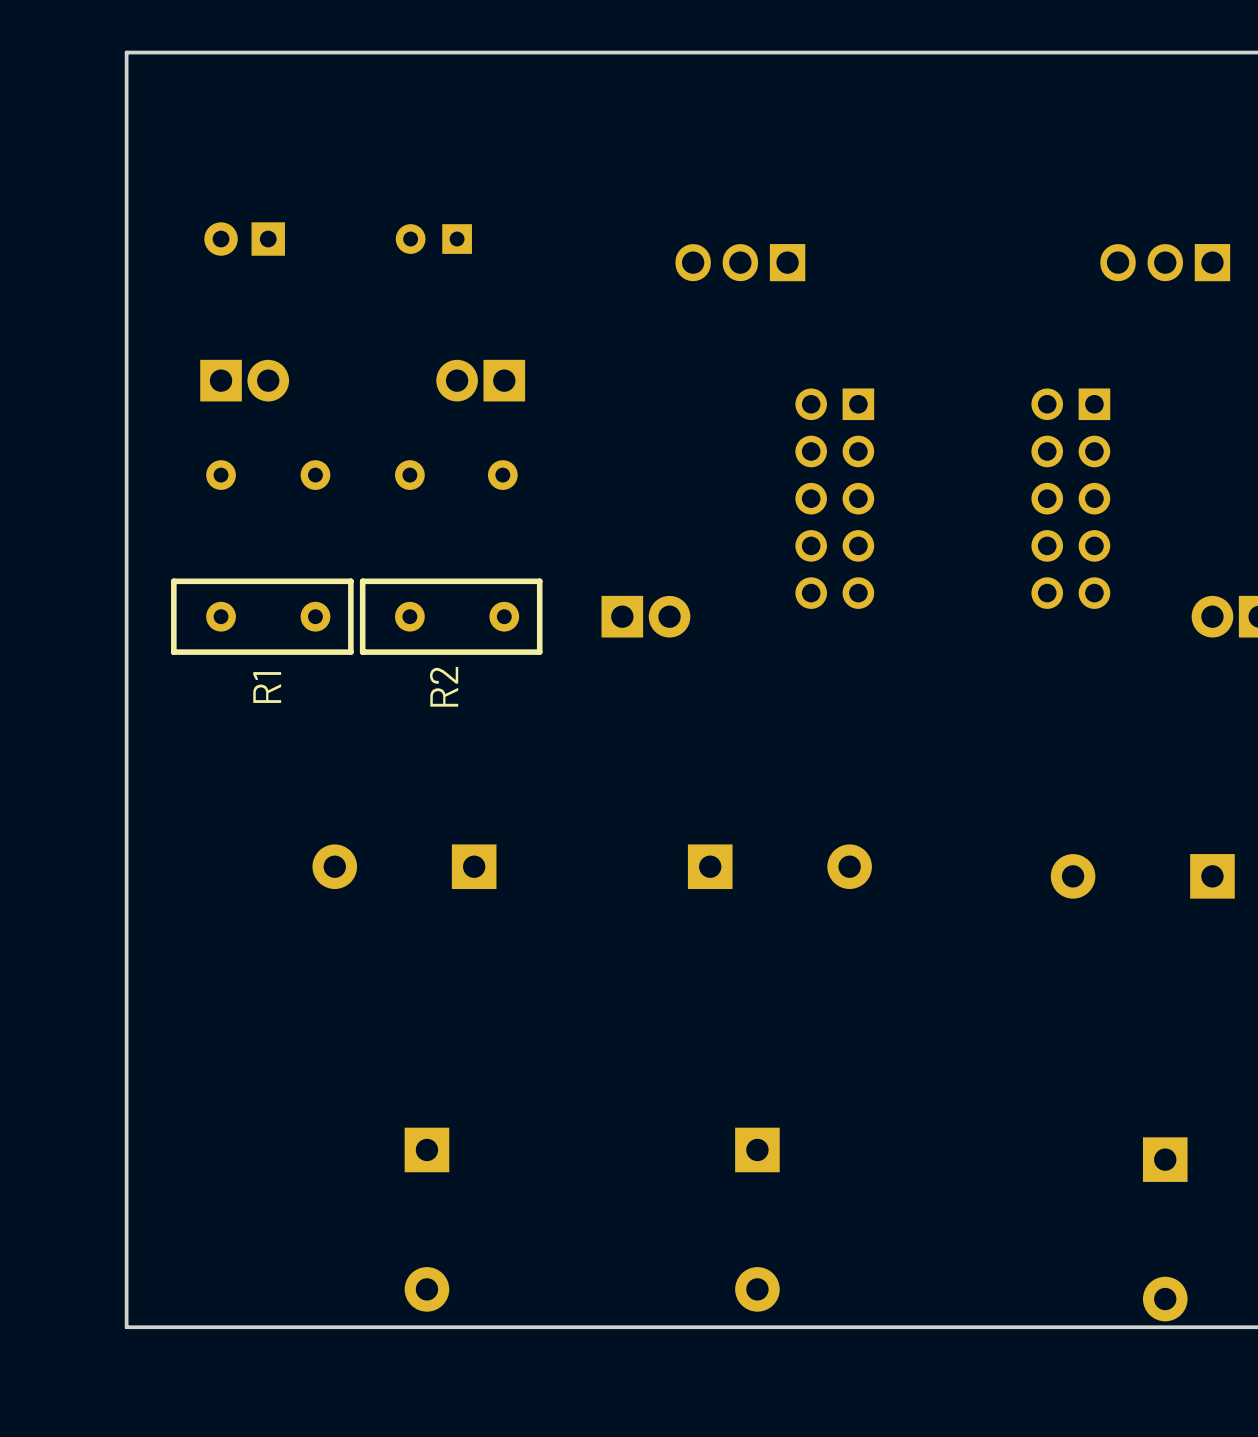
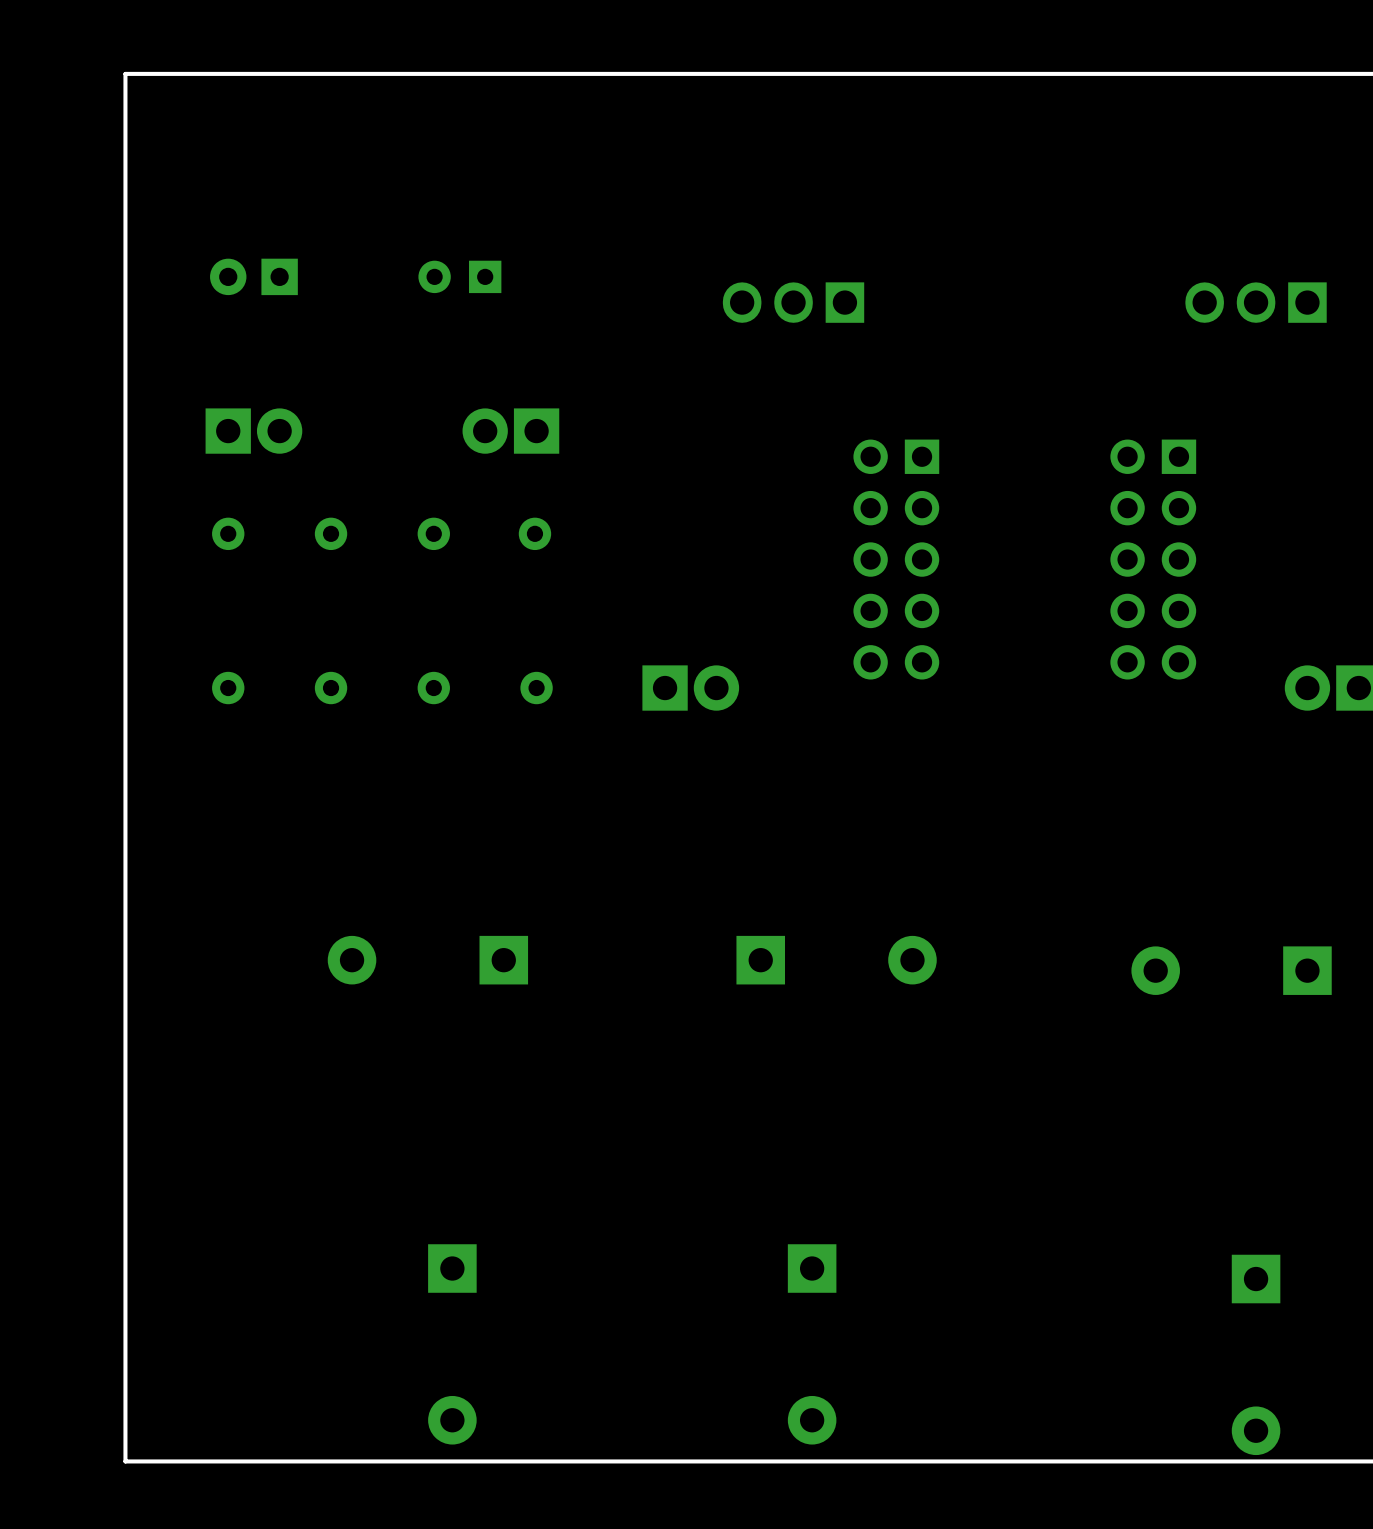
line: (350, 581) (173, 581) (173, 652) (350, 652) (350, 581) -> none
line: (539, 581) (362, 581) (362, 652) (539, 652) (539, 581) -> none
text: R2 (444, 686) -> none
text: R1 (267, 687) -> none

